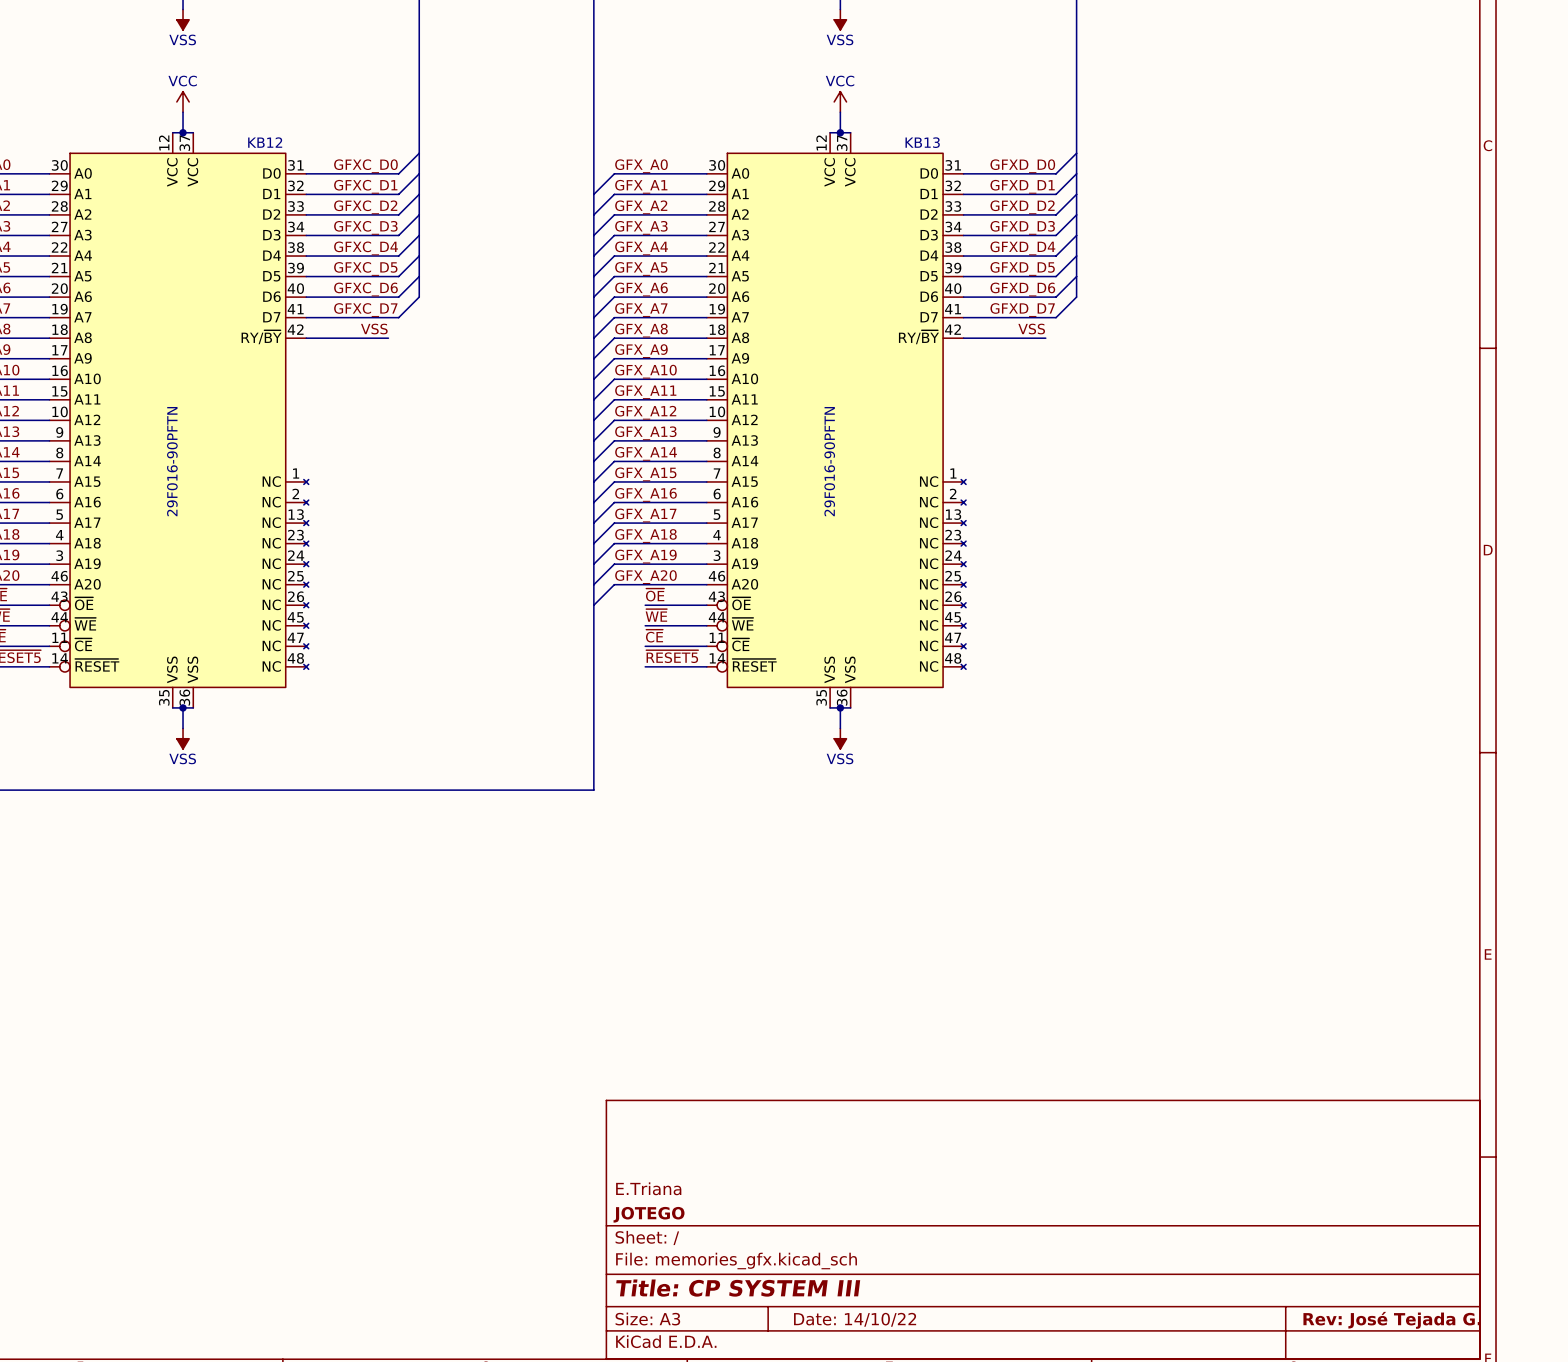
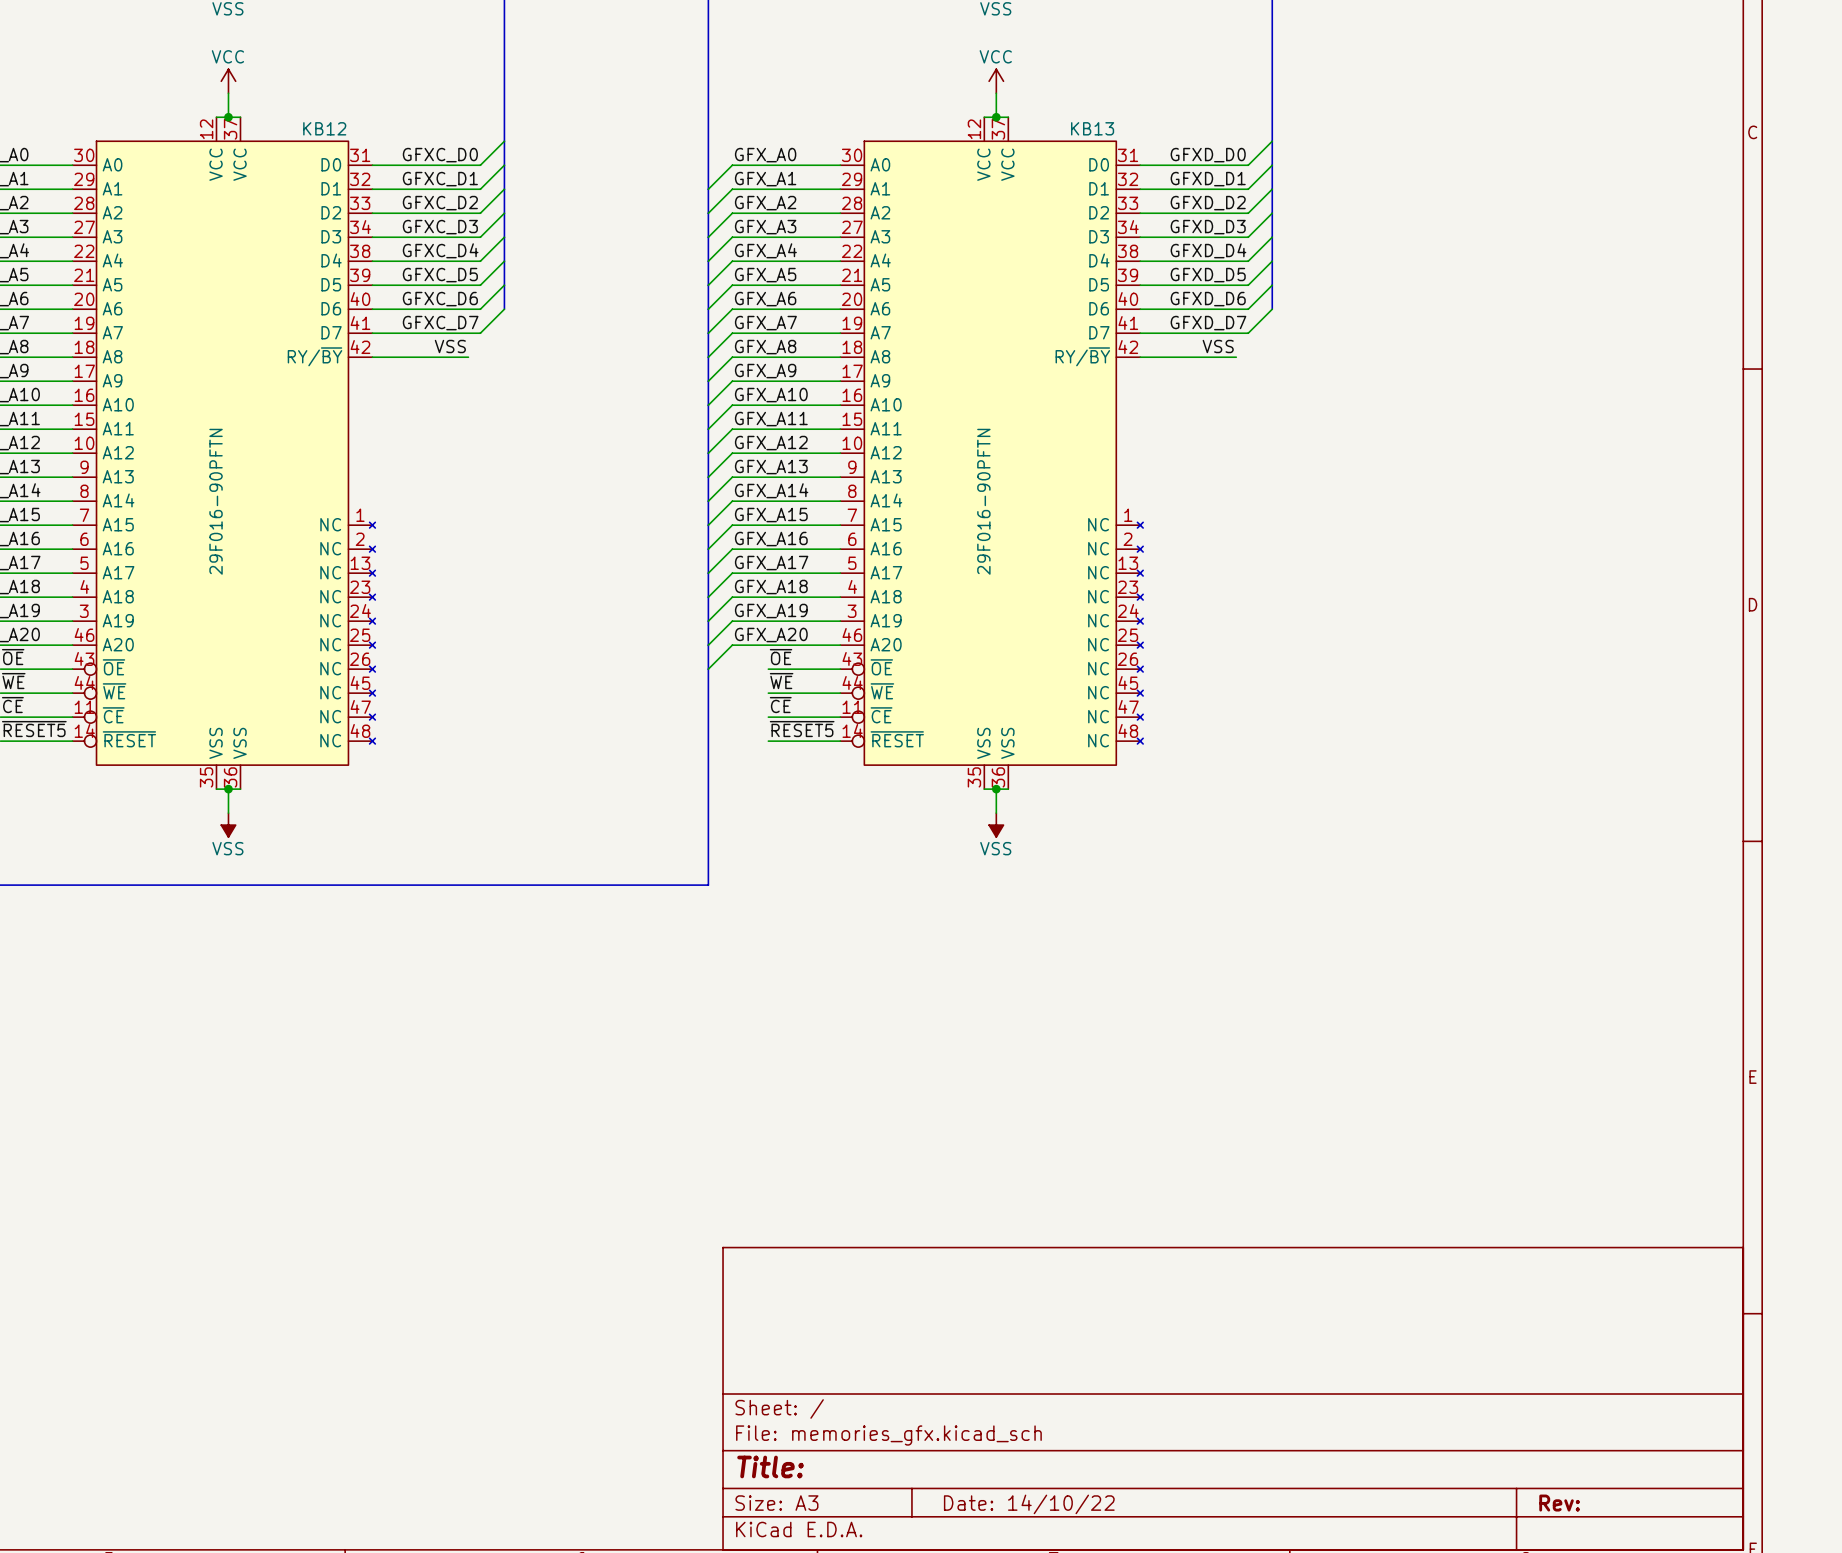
title block: E.Triana (648, 1188) -> none
title block: JOTEGO (649, 1214) -> none
title block: Title: CP SYSTEM III (738, 1288) -> Title: (770, 1466)
title block: Rev: José Tejada G. (1392, 1320) -> Rev: (1559, 1503)

